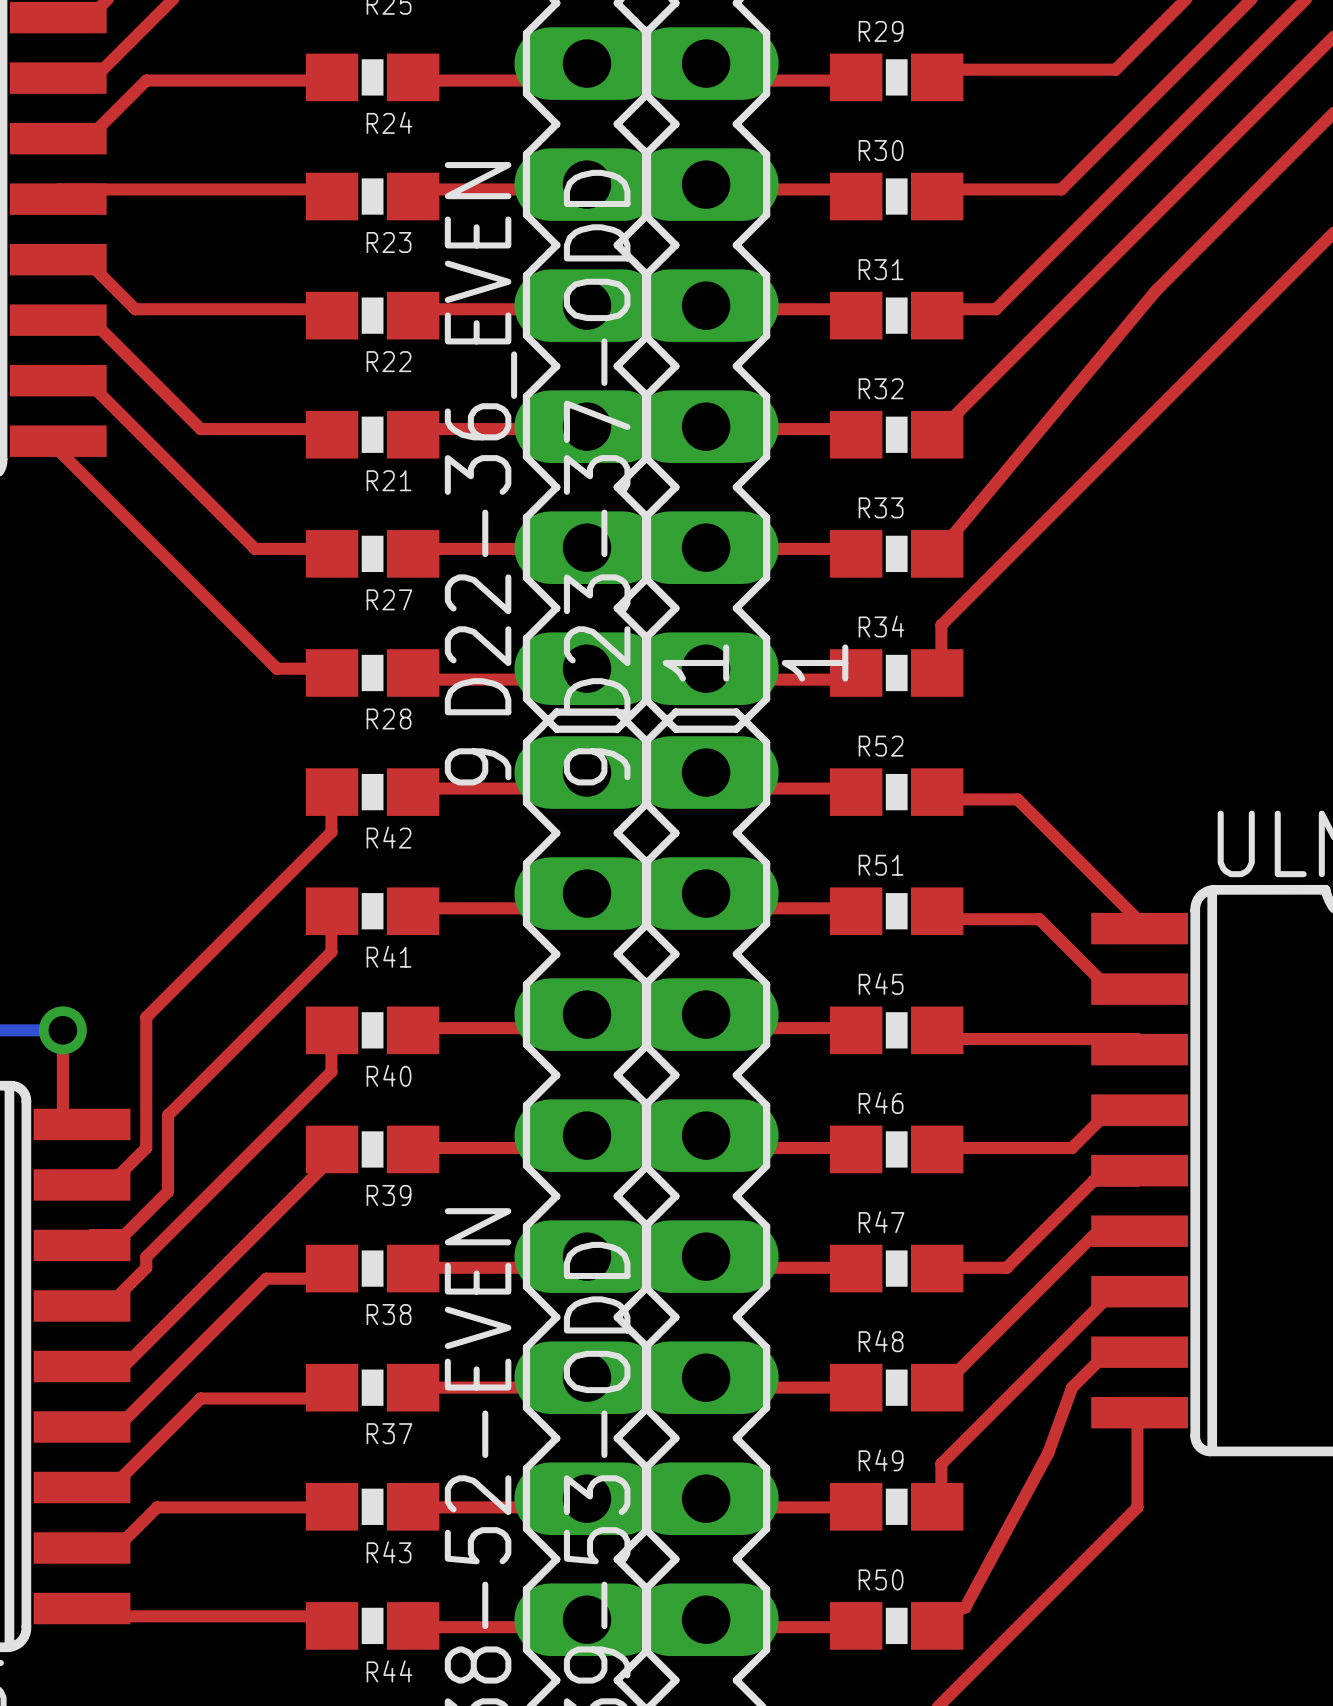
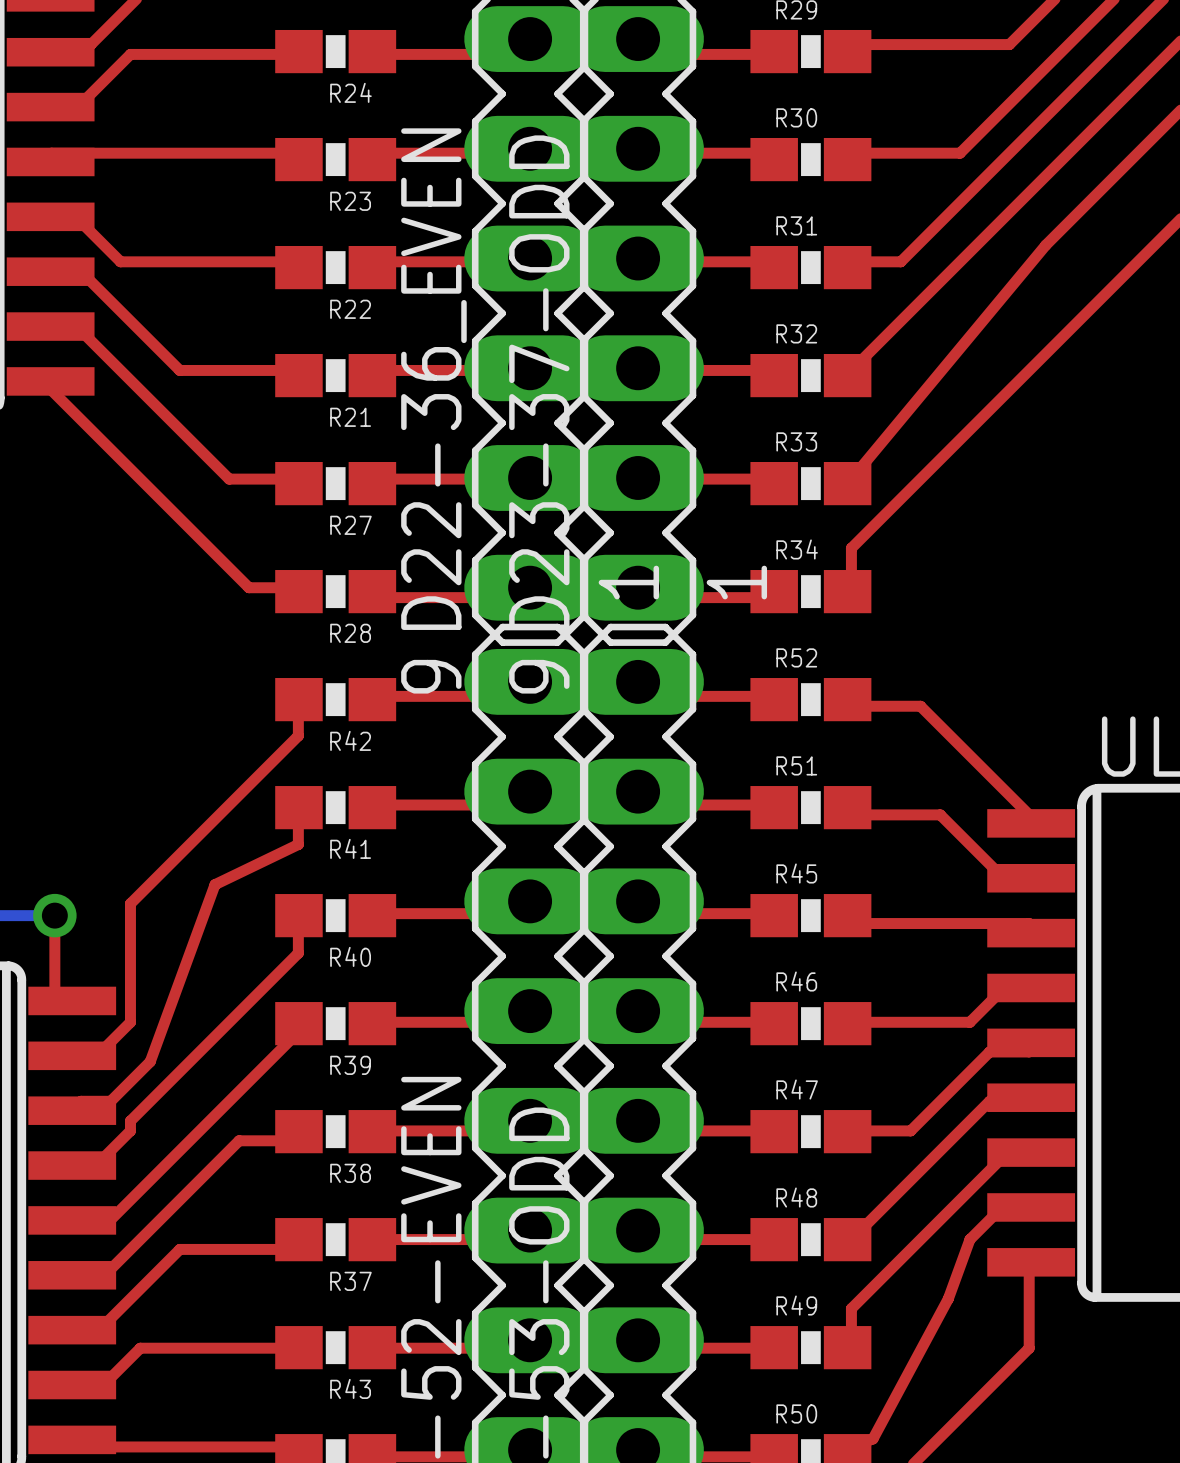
top track: (331, 951) (168, 1115) (168, 1191) -> (298, 844) (215, 884) (150, 1061)

